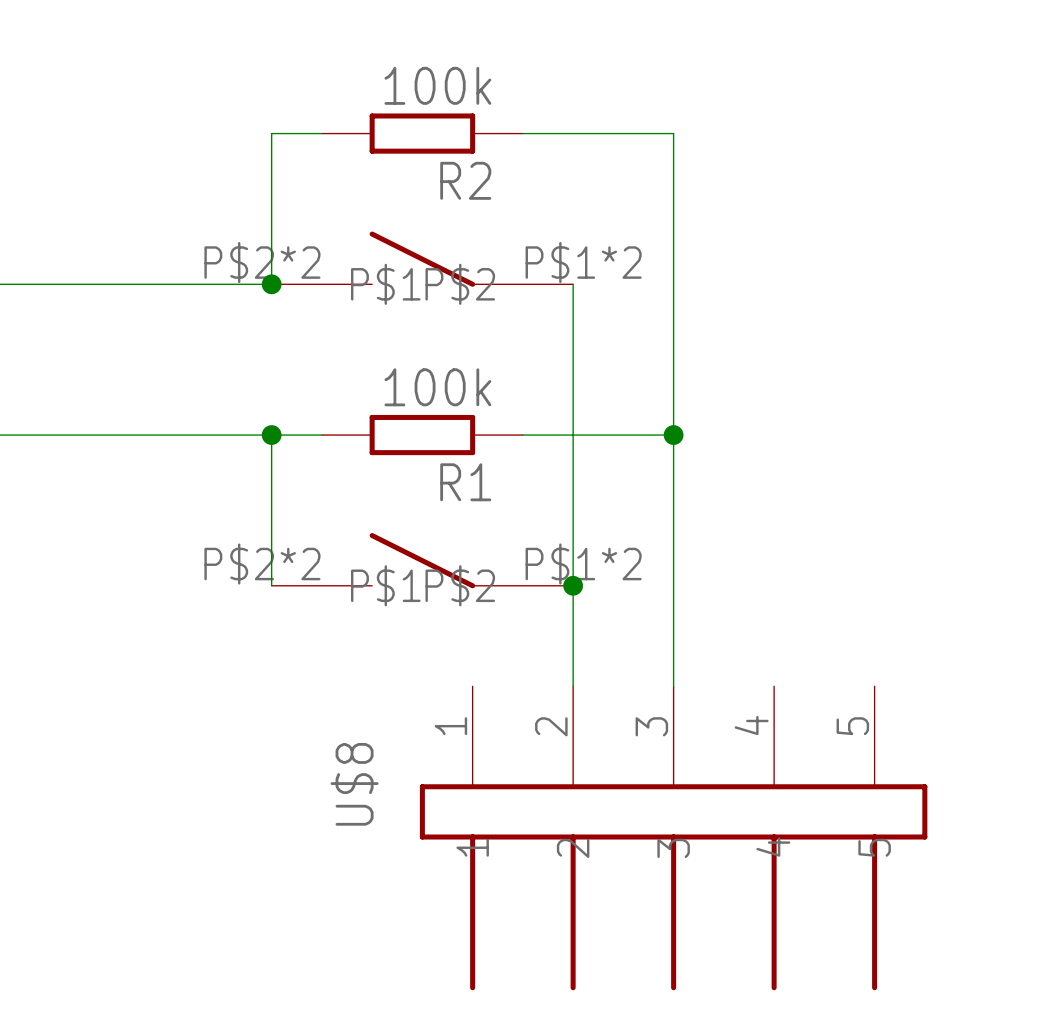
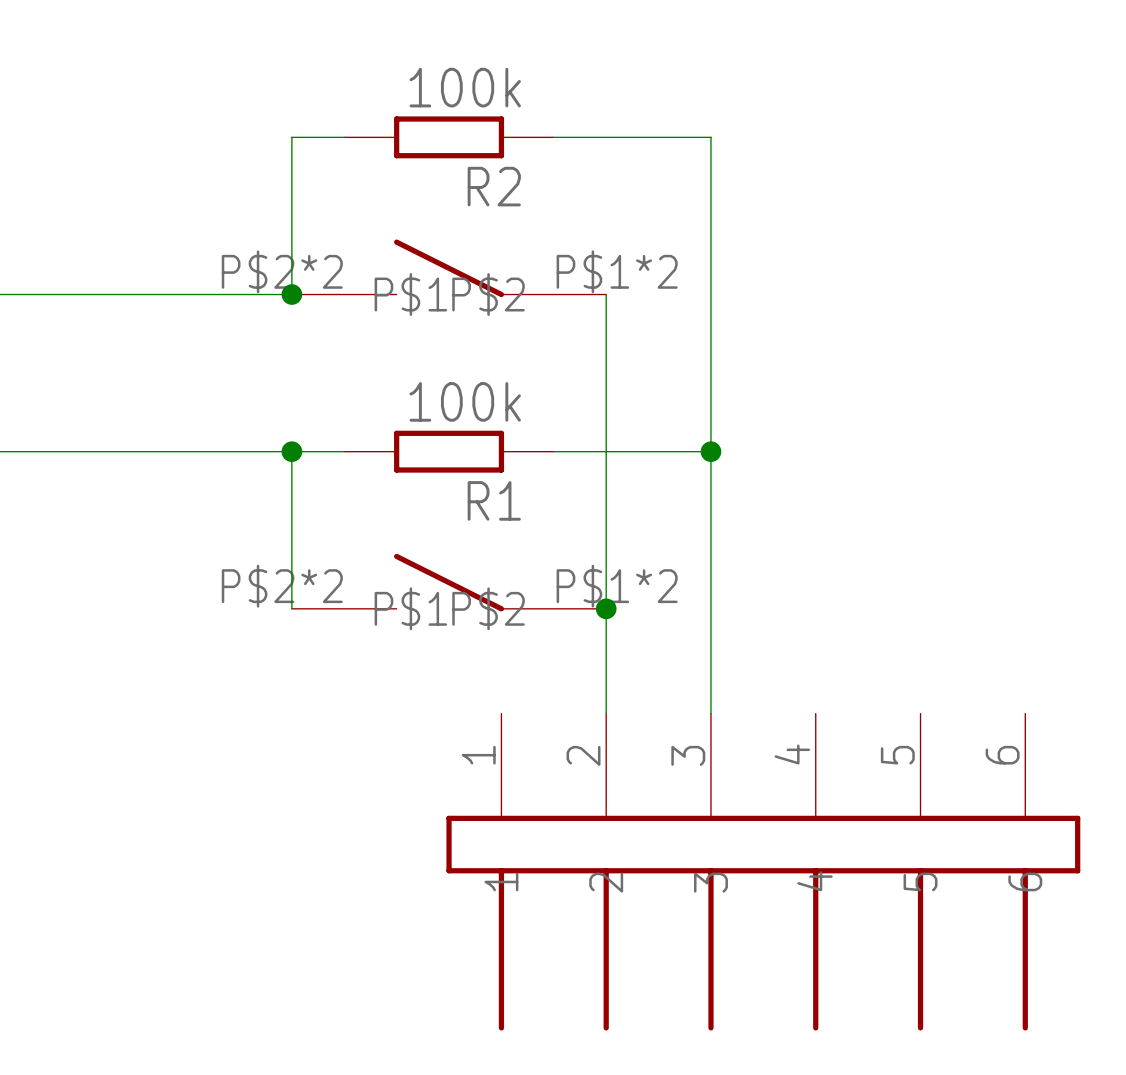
U$8: (673, 838) -> none
part: none -> (763, 872)

